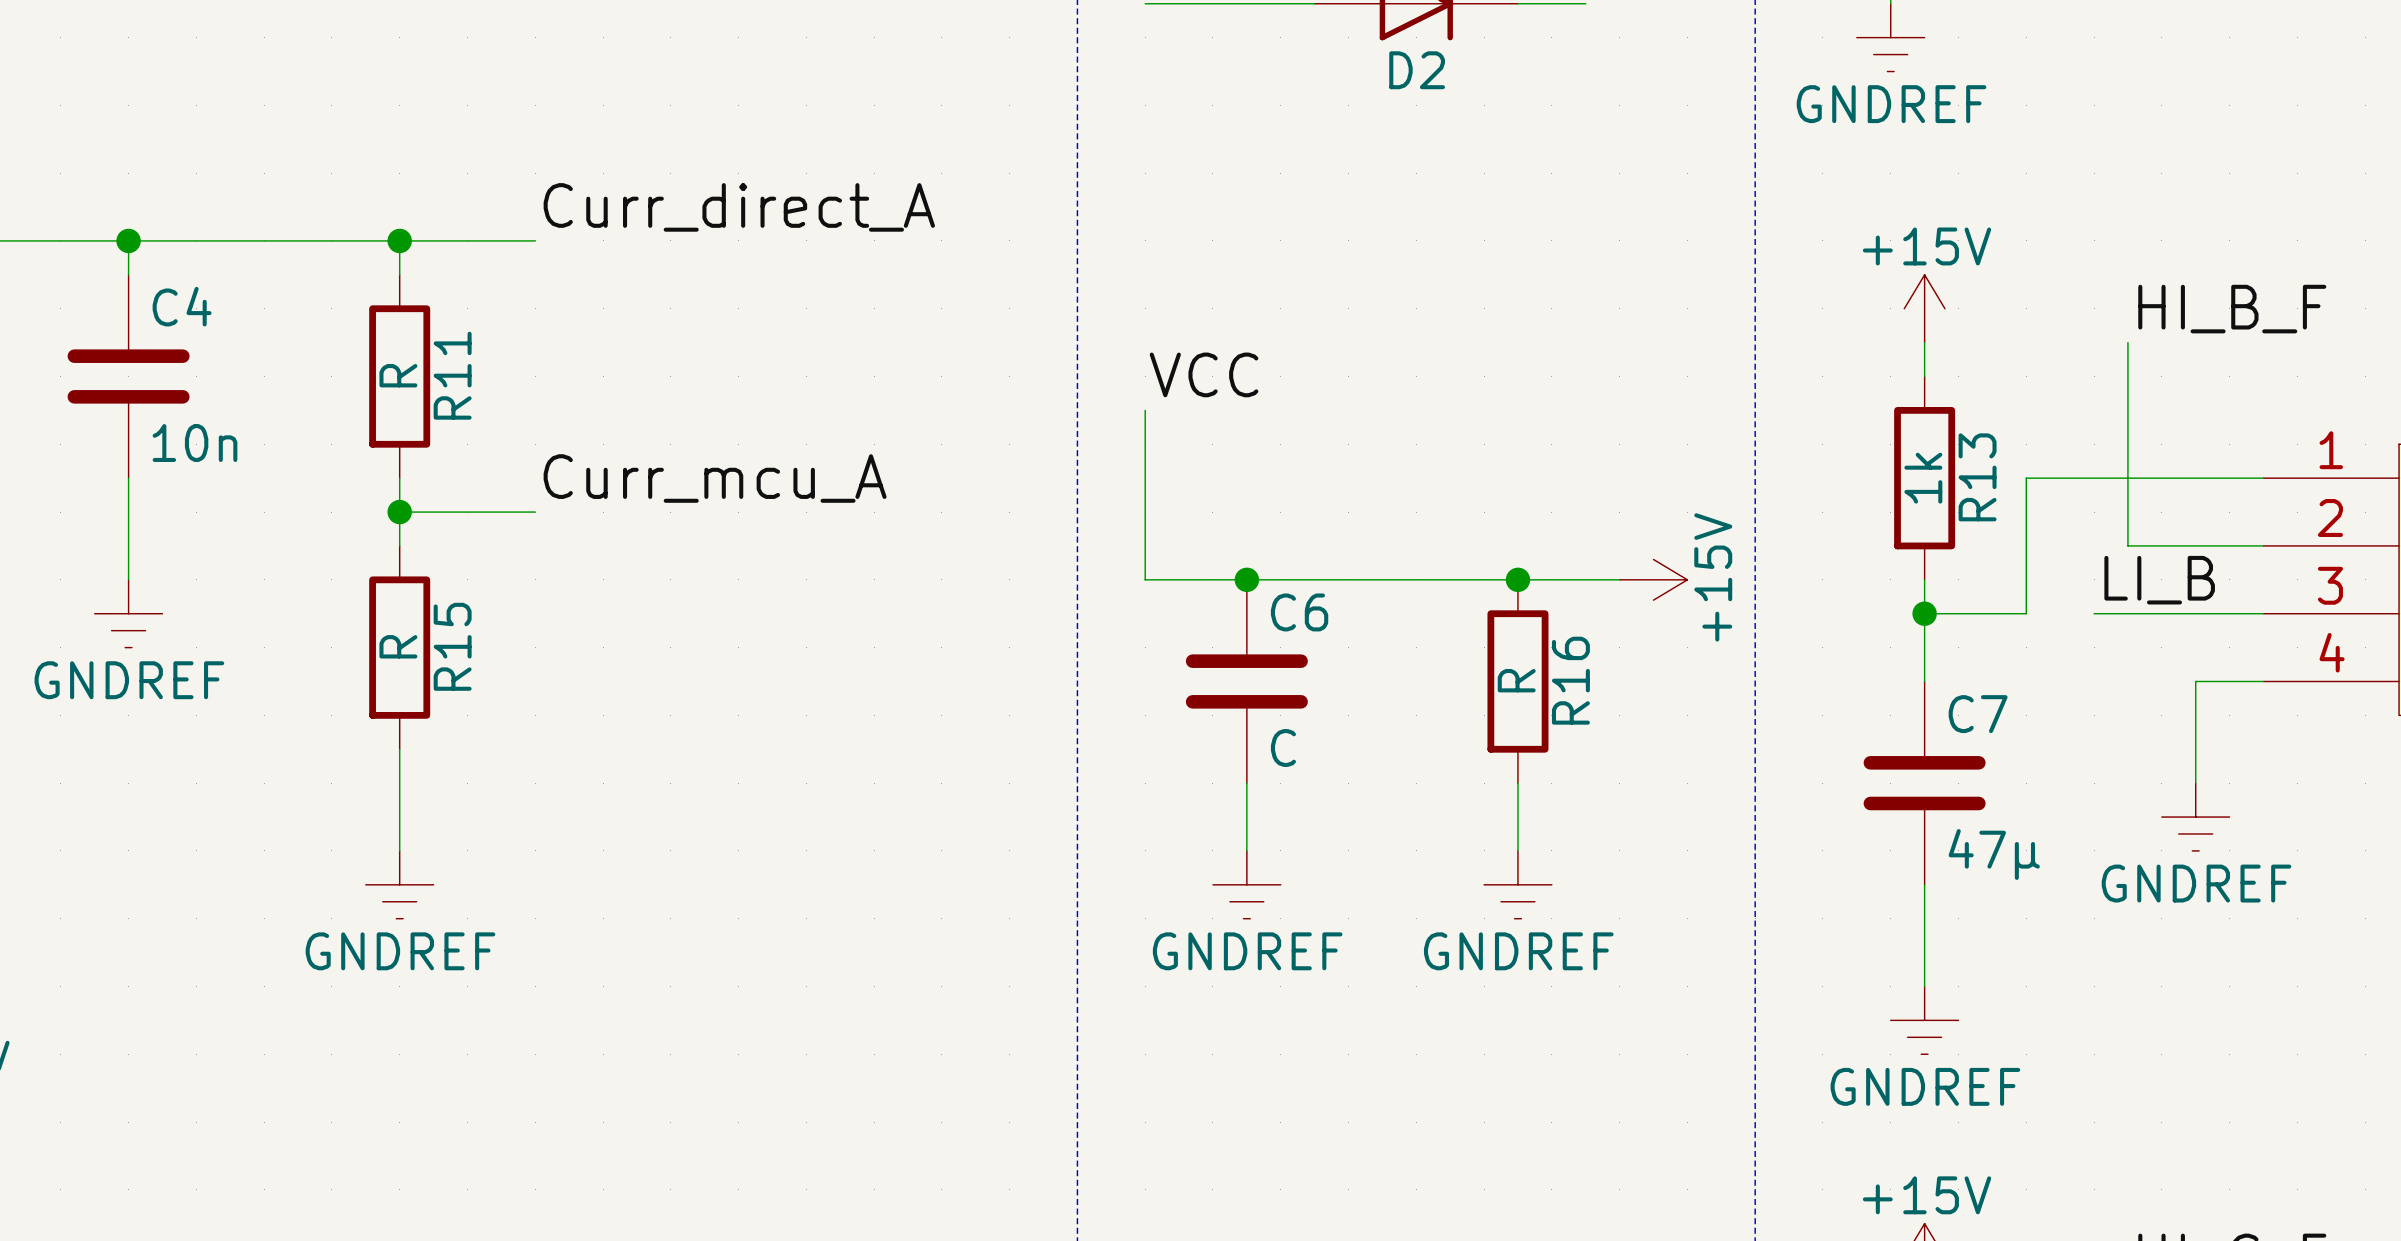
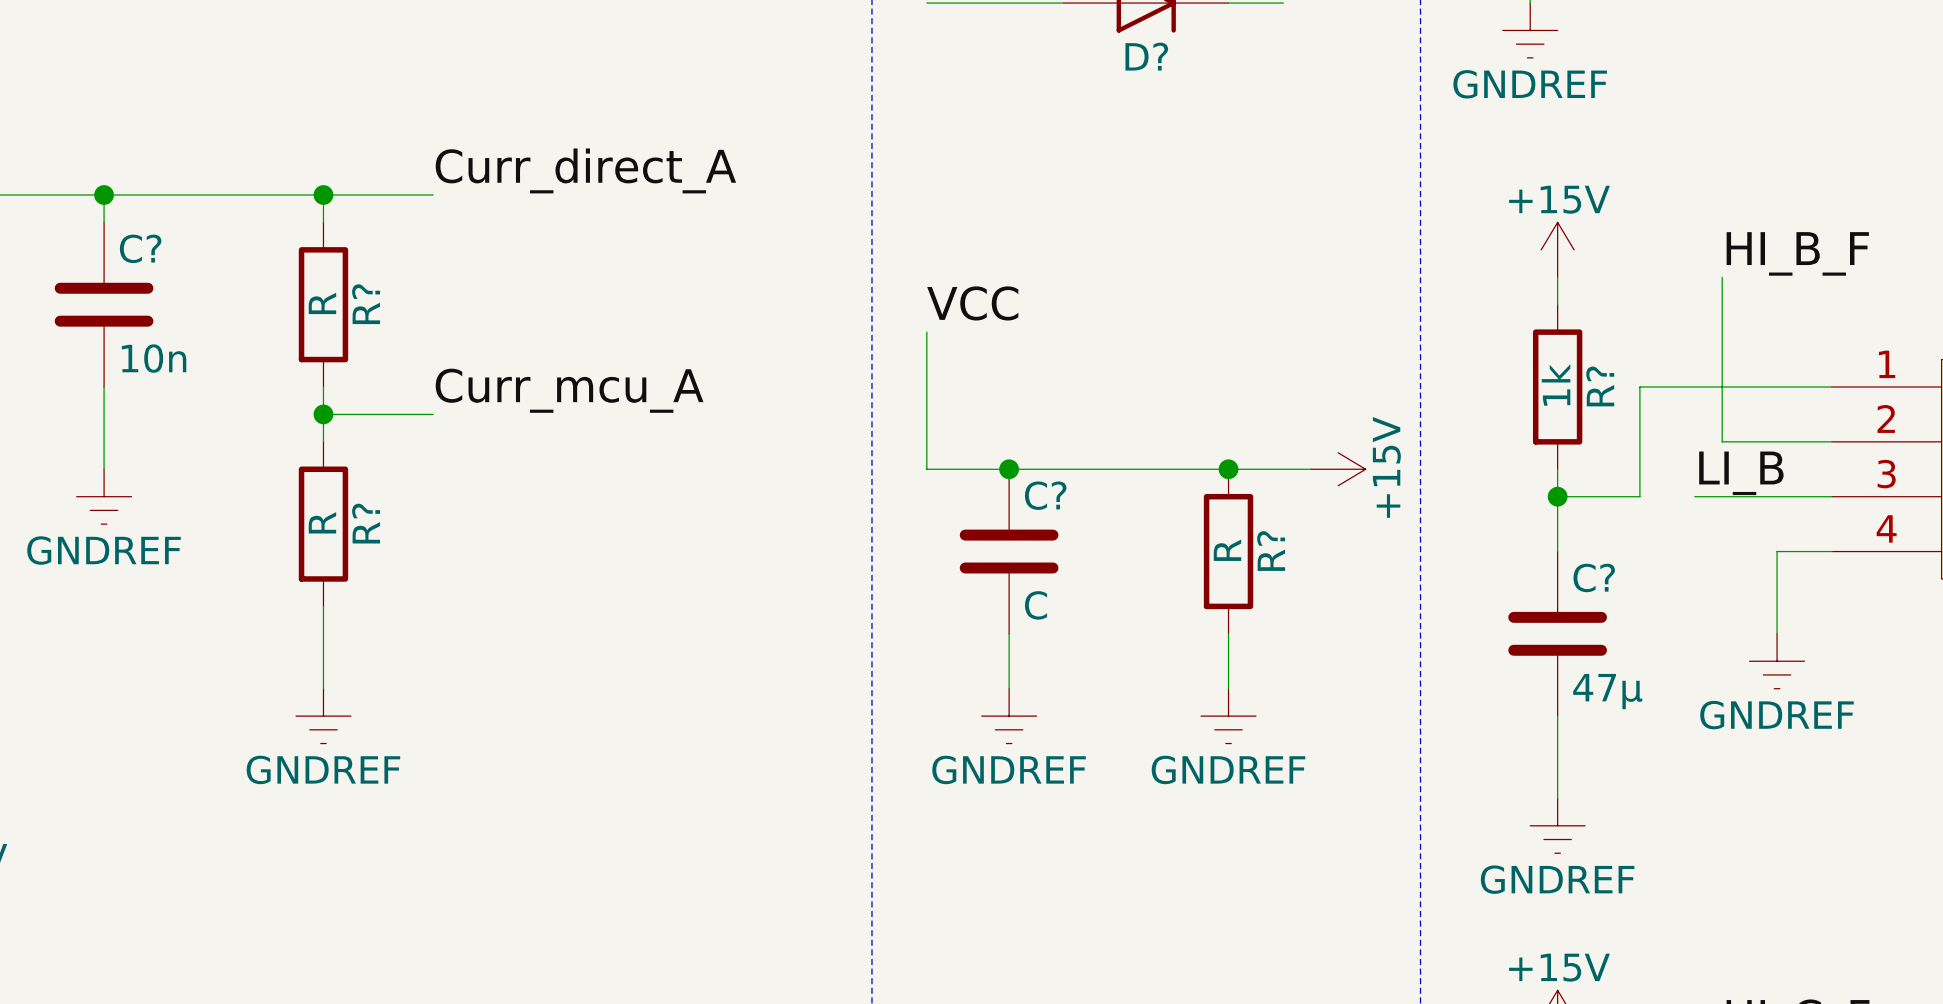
D2 name: D2 (1417, 70) -> D? (1146, 56)
C4 name: C4 (182, 306) -> C? (140, 248)
R11 name: R11 (452, 375) -> R? (366, 304)
R13 name: R13 (1977, 477) -> R? (1600, 386)
C6 name: C6 (1299, 612) -> C? (1045, 495)
R15 name: R15 (452, 646) -> R? (366, 523)
R16 name: R16 (1570, 680) -> R? (1271, 551)
C7 name: C7 (1978, 714) -> C? (1594, 577)

